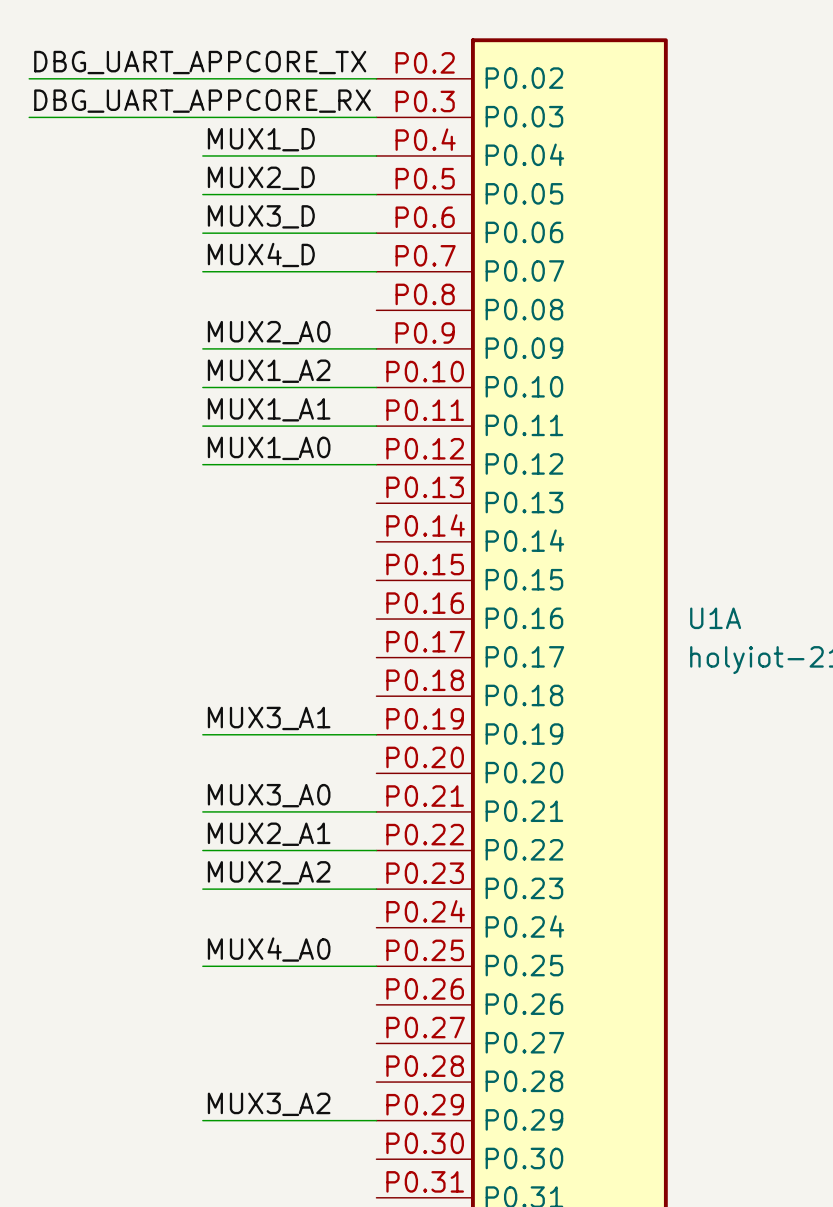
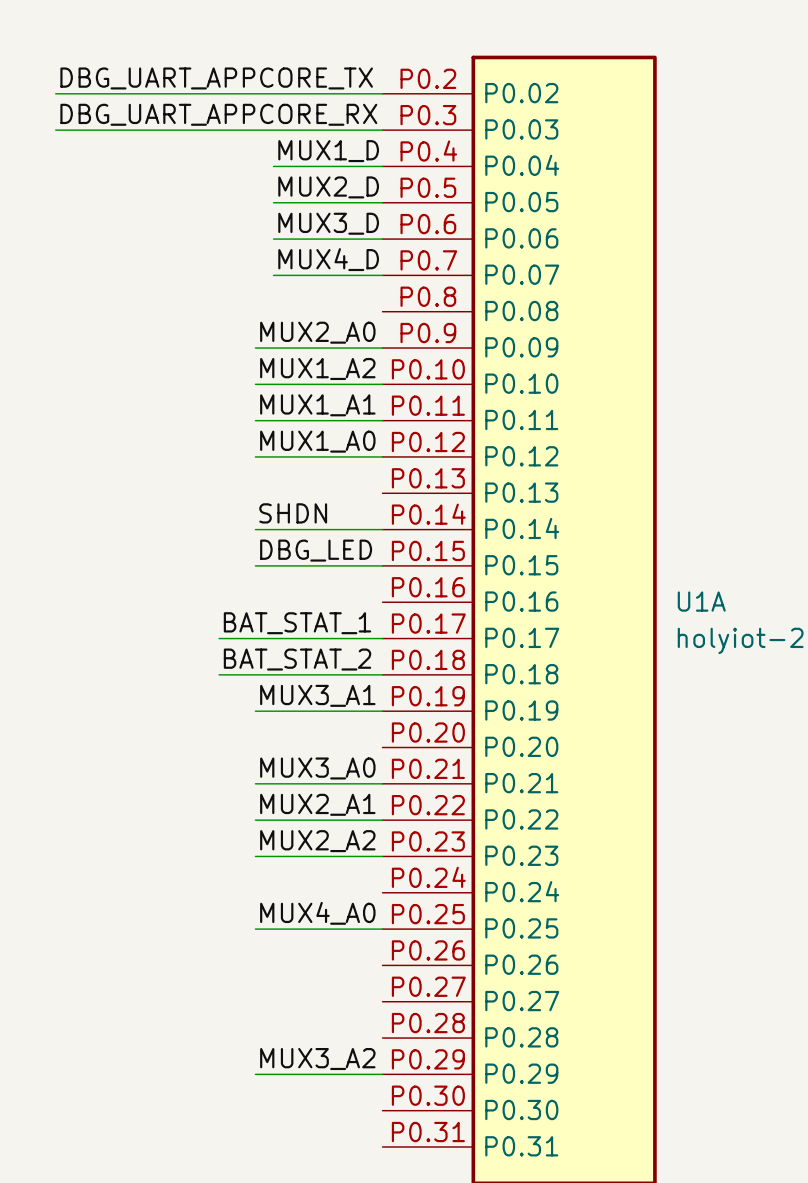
label position: MUX1_D (261, 139) -> MUX1_D (328, 151)
wire: (202, 155) (260, 155) -> none
label position: MUX2_D (261, 178) -> MUX2_D (328, 187)
wire: (202, 194) (260, 194) -> none
label position: MUX3_D (261, 216) -> MUX3_D (328, 223)
wire: (202, 233) (260, 233) -> none
label position: MUX4_D (261, 254) -> MUX4_D (328, 259)
wire: (202, 271) (260, 271) -> none
label position: MUX2_A0 (269, 332) -> MUX2_A0 (317, 332)
wire: (202, 348) (241, 348) -> none
label position: MUX1_A2 (269, 371) -> MUX1_A2 (317, 369)
wire: (202, 387) (241, 387) -> none
label position: MUX1_A1 (269, 409) -> MUX1_A1 (317, 405)
wire: (202, 426) (241, 426) -> none
label position: MUX1_A0 (269, 448) -> MUX1_A0 (317, 441)
wire: (202, 464) (241, 464) -> none
label: none -> SHDN (293, 513)
wire: none -> (255, 529) (382, 529)
label: none -> DBG_LED (316, 550)
wire: none -> (255, 565) (382, 565)
label: none -> BAT_STAT_1 (297, 623)
wire: none -> (219, 638) (382, 638)
label: none -> BAT_STAT_2 (297, 659)
wire: none -> (219, 674) (382, 674)
label position: MUX3_A1 (269, 718) -> MUX3_A1 (317, 695)
wire: (202, 734) (241, 734) -> none
label position: MUX3_A0 (269, 795) -> MUX3_A0 (317, 768)
wire: (202, 811) (241, 811) -> none
label position: MUX2_A1 (269, 834) -> MUX2_A1 (317, 804)
wire: (202, 850) (241, 850) -> none
label position: MUX2_A2 (269, 872) -> MUX2_A2 (317, 841)
wire: (202, 889) (241, 889) -> none
label position: MUX4_A0 (269, 949) -> MUX4_A0 (317, 913)
wire: (202, 966) (241, 966) -> none
label position: MUX3_A2 (269, 1104) -> MUX3_A2 (317, 1059)
wire: (202, 1120) (241, 1120) -> none

